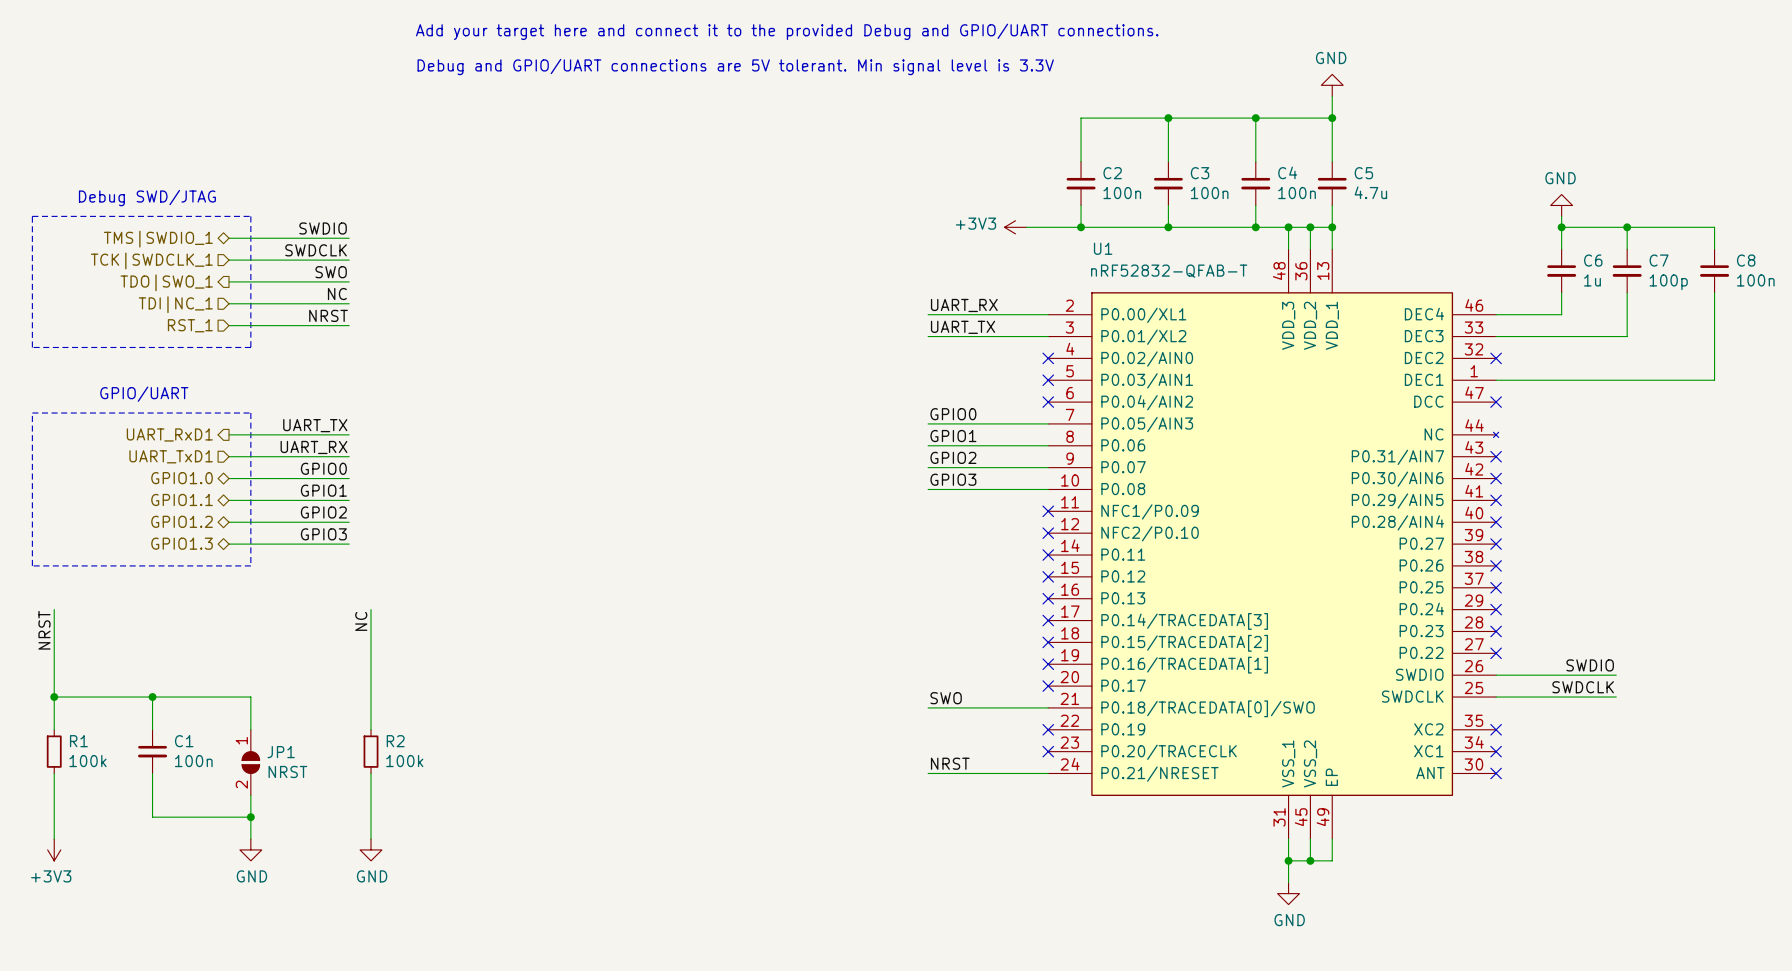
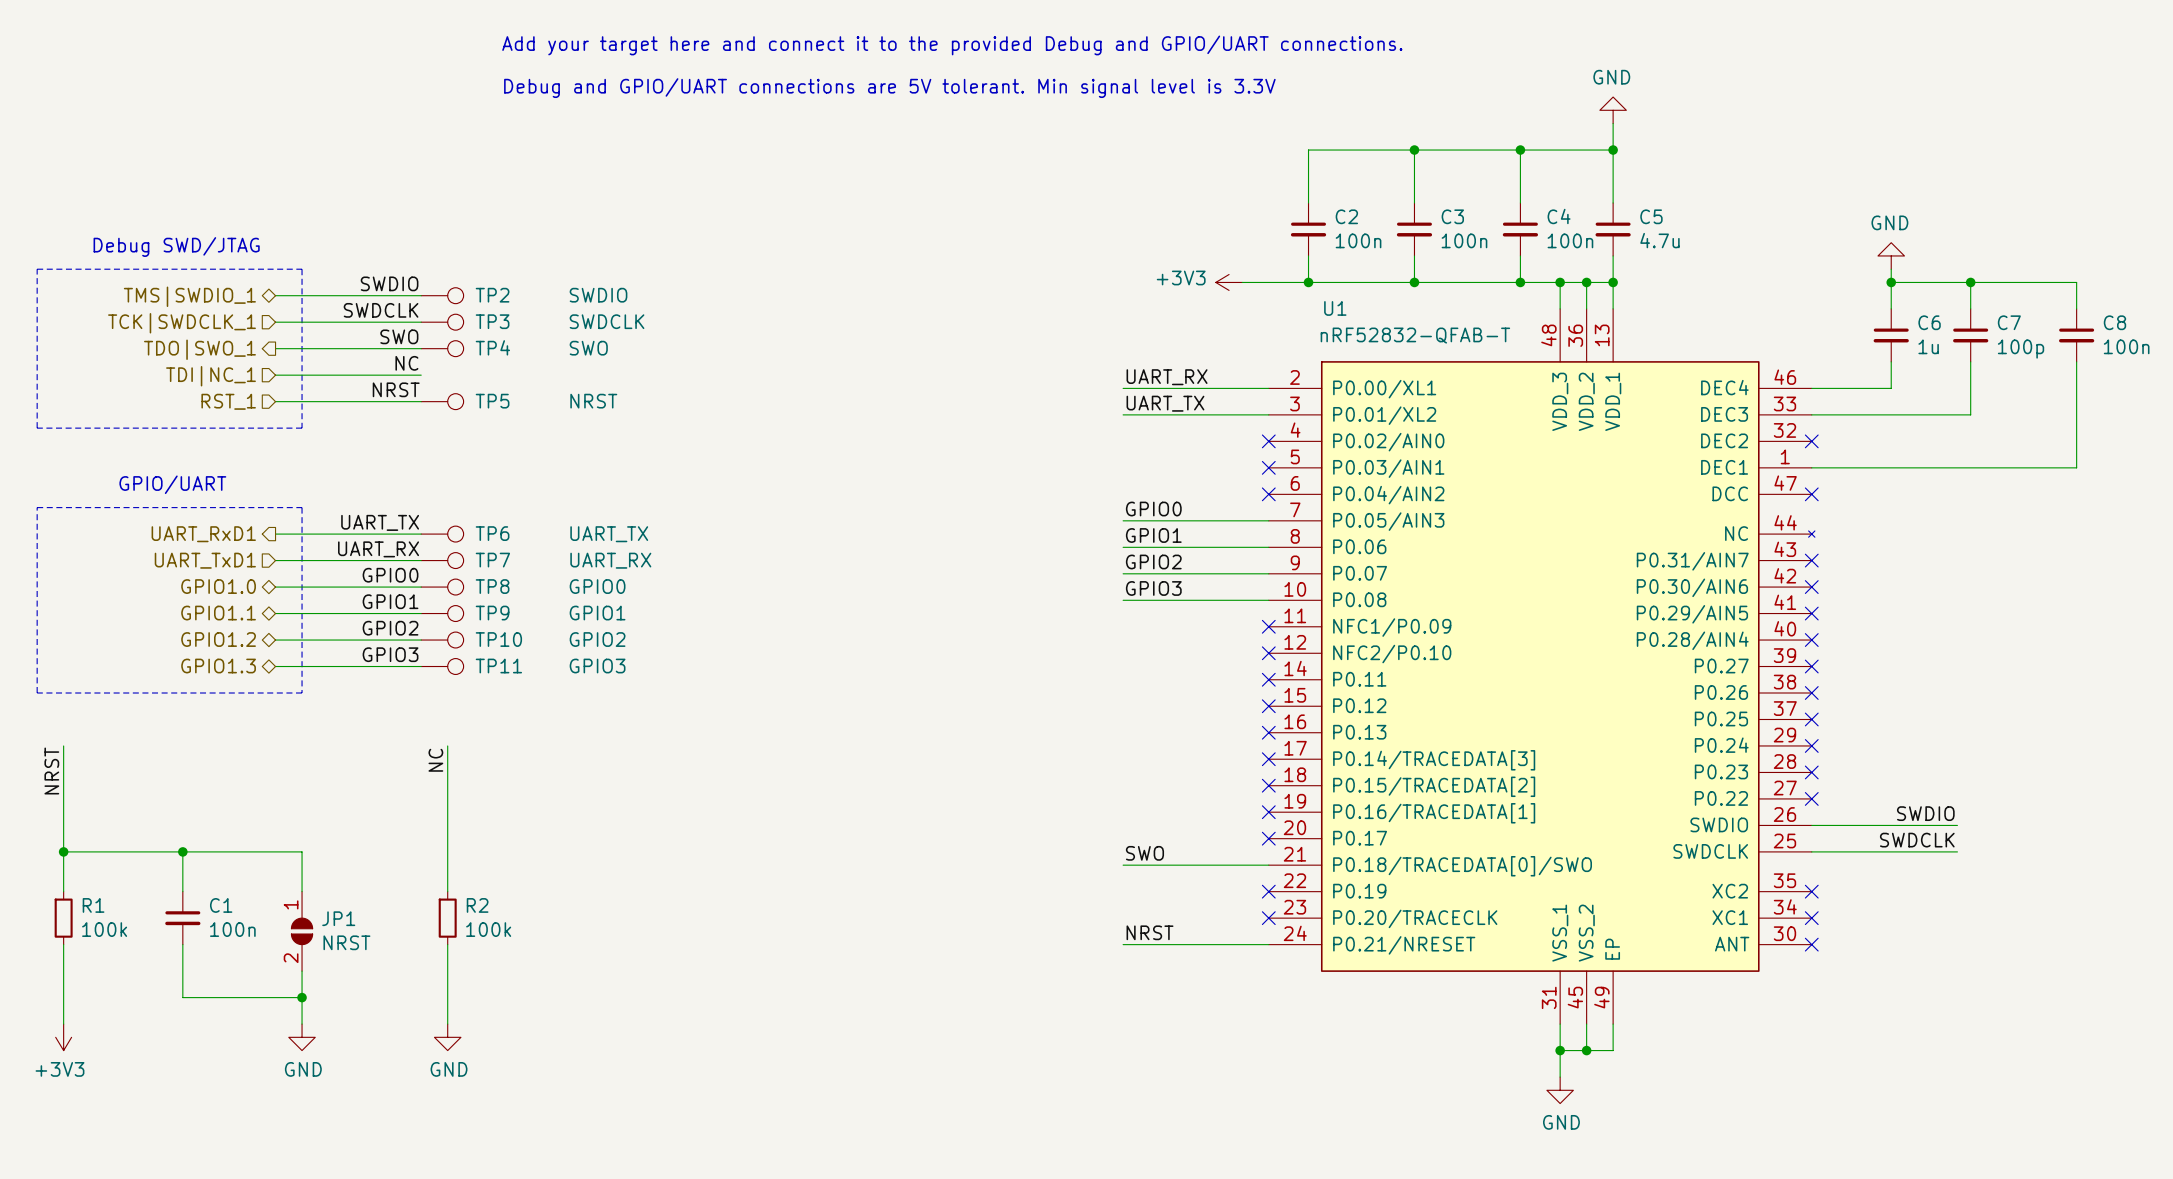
TP2: none -> SWDIO (442, 295)
TP3: none -> SWDCLK (442, 322)
TP4: none -> SWO (442, 348)
TP5: none -> NRST (442, 401)
TP6: none -> UART_TX (442, 534)
TP7: none -> UART_RX (442, 560)
TP8: none -> GPIO0 (442, 587)
TP9: none -> GPIO1 (442, 613)
TP10: none -> GPIO2 (442, 640)
TP11: none -> GPIO3 (442, 666)

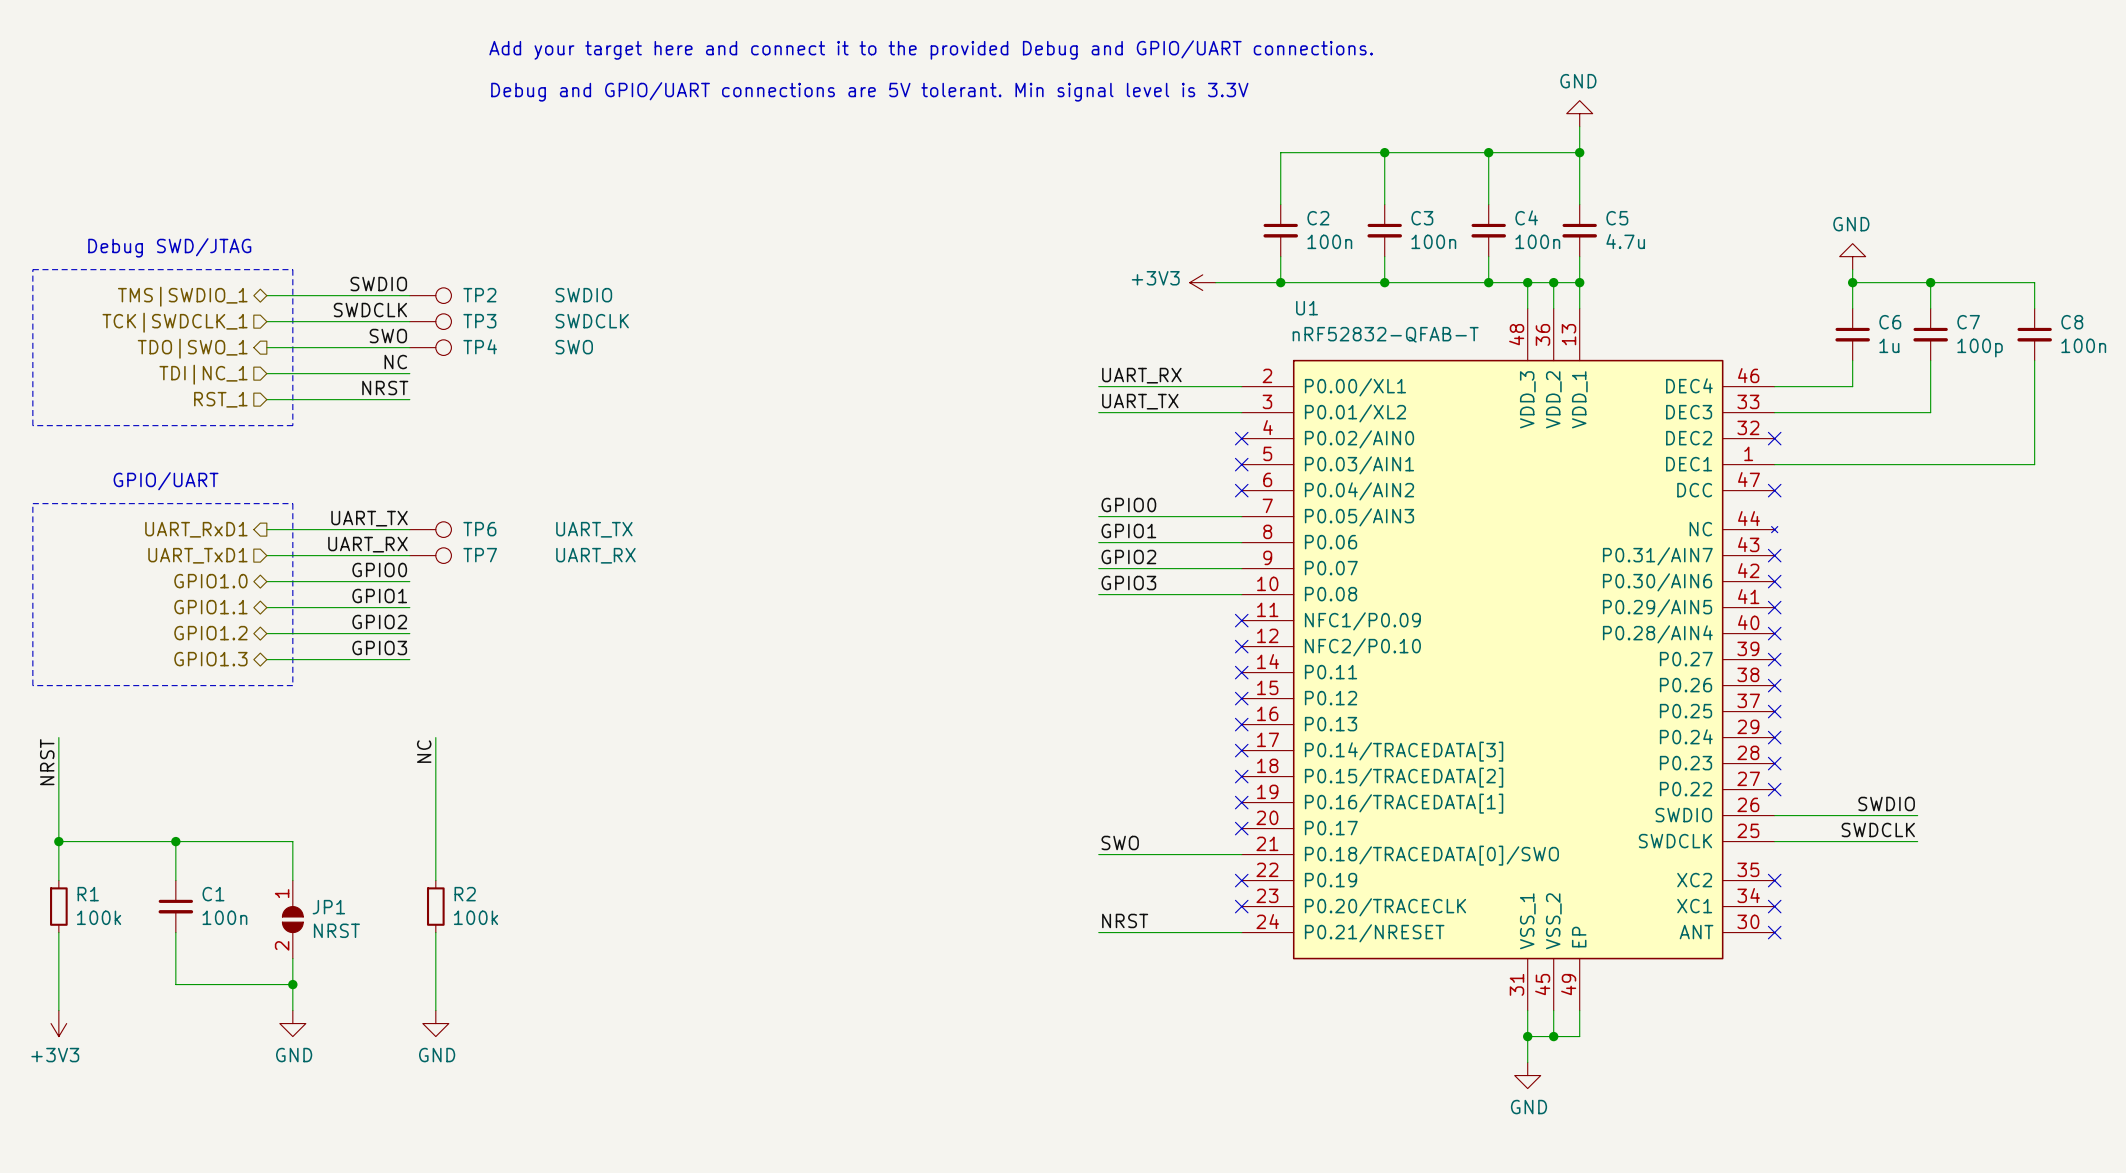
TP5: NRST (442, 401) -> none
TP8: GPIO0 (442, 587) -> none
TP9: GPIO1 (442, 613) -> none
TP10: GPIO2 (442, 640) -> none
TP11: GPIO3 (442, 666) -> none

